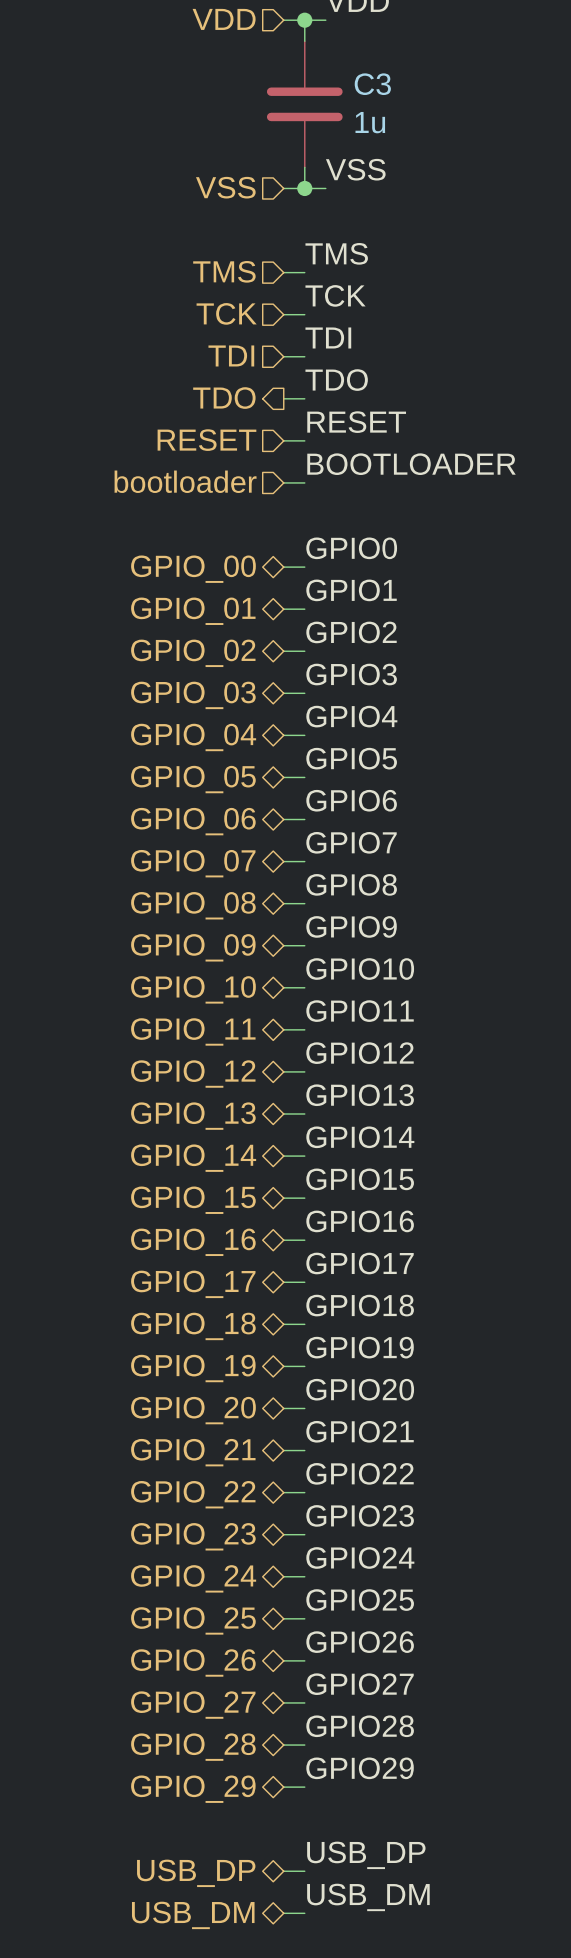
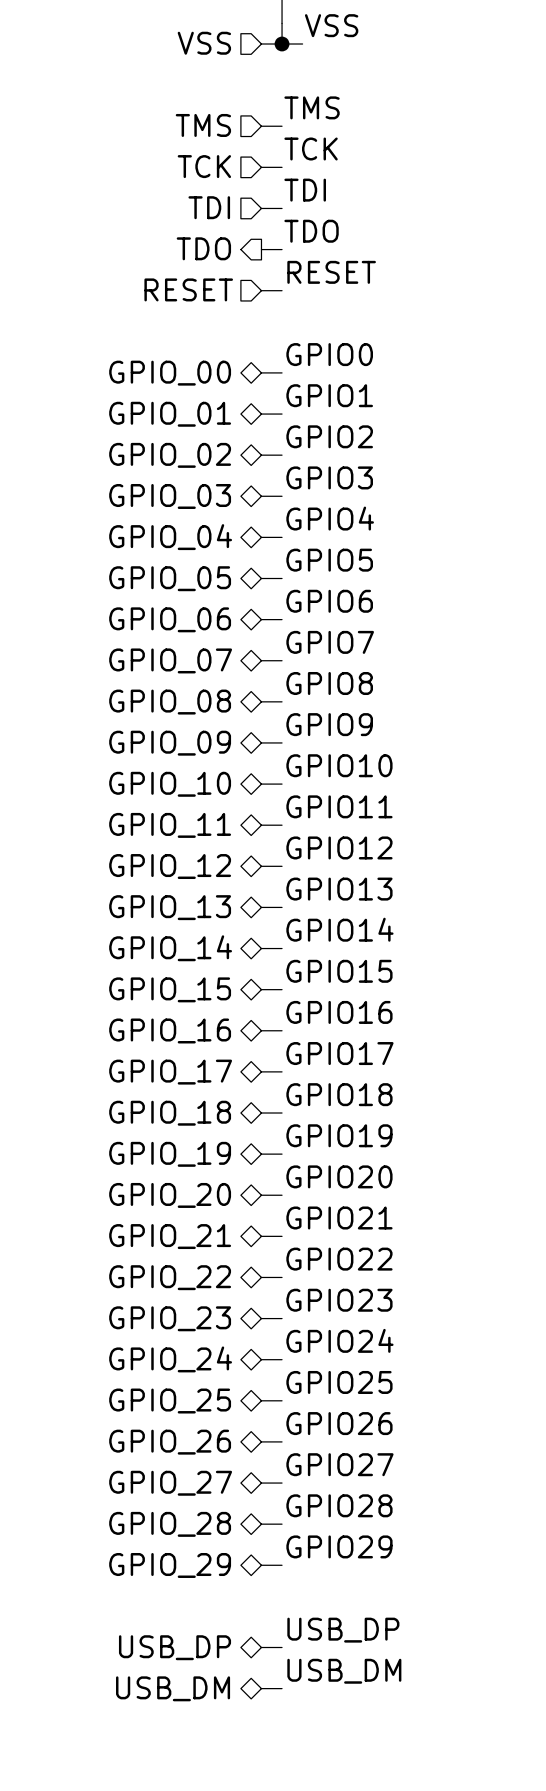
label: BOOTLOADER (411, 464) -> none
hierarchical label: bootloader (185, 481) -> none
wire: (283, 482) (304, 482) -> (261, 372) (282, 372)
label: none -> GPIO0 (329, 354)
hierarchical label: none -> GPIO_00 (170, 373)
label: GPIO0 (351, 548) -> GPIO1 (329, 395)
hierarchical label: GPIO_00 (193, 569) -> GPIO_01 (170, 414)
label: GPIO1 (351, 590) -> GPIO2 (329, 436)
hierarchical label: GPIO_01 (193, 611) -> GPIO_02 (170, 455)
label: GPIO2 (351, 632) -> GPIO3 (329, 477)
hierarchical label: GPIO_02 (193, 653) -> GPIO_03 (170, 496)
label: GPIO3 (351, 674) -> GPIO4 (330, 518)
hierarchical label: GPIO_03 (193, 695) -> GPIO_04 (170, 537)
label: GPIO4 (351, 716) -> GPIO5 (329, 560)
hierarchical label: GPIO_04 (193, 737) -> GPIO_05 (170, 578)
label: GPIO5 (351, 758) -> GPIO6 (329, 601)
hierarchical label: GPIO_05 (193, 779) -> GPIO_06 (170, 619)
label: GPIO6 (351, 800) -> GPIO7 (330, 642)
hierarchical label: GPIO_06 (193, 821) -> GPIO_07 (170, 660)
label: GPIO7 (351, 842) -> GPIO8 (329, 683)
hierarchical label: GPIO_07 (193, 863) -> GPIO_08 (170, 702)
label: GPIO8 (351, 884) -> GPIO9 (329, 724)
hierarchical label: GPIO_08 (193, 905) -> GPIO_09 (170, 743)
label: GPIO9 (351, 926) -> GPIO10 (339, 765)
hierarchical label: GPIO_09 (193, 947) -> GPIO_10 (170, 784)
label: GPIO10 (360, 969) -> GPIO11 (339, 806)
hierarchical label: GPIO_10 (193, 989) -> GPIO_11 (170, 825)
label: GPIO11 (360, 1011) -> GPIO12 (339, 847)
hierarchical label: GPIO_11 (193, 1031) -> GPIO_12 (170, 866)
label: GPIO12 (360, 1053) -> GPIO13 (339, 889)
hierarchical label: GPIO_12 (193, 1074) -> GPIO_13 (170, 907)
label: GPIO13 (360, 1095) -> GPIO14 (339, 929)
hierarchical label: GPIO_13 (193, 1116) -> GPIO_14 (170, 948)
label: GPIO14 (360, 1137) -> GPIO15 (339, 971)
hierarchical label: GPIO_14 (193, 1158) -> GPIO_15 (170, 989)
label: GPIO15 (360, 1179) -> GPIO16 (339, 1012)
hierarchical label: GPIO_15 (193, 1200) -> GPIO_16 (170, 1030)
label: GPIO16 (360, 1221) -> GPIO17 (339, 1053)
hierarchical label: GPIO_16 (193, 1242) -> GPIO_17 (170, 1072)
label: GPIO17 (360, 1263) -> GPIO18 (339, 1094)
hierarchical label: GPIO_17 (193, 1284) -> GPIO_18 (170, 1113)
label: GPIO18 (360, 1305) -> GPIO19 (339, 1135)
hierarchical label: GPIO_18 (193, 1326) -> GPIO_19 (170, 1154)
label: GPIO19 (360, 1347) -> GPIO20 (339, 1176)
hierarchical label: GPIO_19 (193, 1368) -> GPIO_20 (170, 1195)
label: GPIO20 (360, 1389) -> GPIO21 (339, 1218)
hierarchical label: GPIO_20 (193, 1410) -> GPIO_21 (170, 1236)
label: GPIO21 (360, 1431) -> GPIO22 (339, 1259)
hierarchical label: GPIO_21 (193, 1452) -> GPIO_22 (170, 1277)
label: GPIO22 (360, 1473) -> GPIO23 (339, 1300)
hierarchical label: GPIO_22 (193, 1494) -> GPIO_23 (170, 1318)
label: GPIO23 (360, 1515) -> GPIO24 (339, 1340)
hierarchical label: GPIO_23 (193, 1536) -> GPIO_24 (170, 1359)
label: GPIO24 (360, 1557) -> GPIO25 (339, 1382)
hierarchical label: GPIO_24 (193, 1578) -> GPIO_25 (170, 1401)
label: GPIO25 (360, 1600) -> GPIO26 (339, 1423)
hierarchical label: GPIO_25 (193, 1620) -> GPIO_26 (170, 1442)
label: GPIO26 (360, 1642) -> GPIO27 (339, 1464)
hierarchical label: GPIO_26 (193, 1662) -> GPIO_27 (170, 1483)
label: GPIO27 (360, 1684) -> GPIO28 (339, 1505)
hierarchical label: GPIO_27 (193, 1705) -> GPIO_28 (170, 1524)
label: GPIO28 (360, 1726) -> GPIO29 (339, 1546)
hierarchical label: GPIO_28 (193, 1747) -> GPIO_29 (170, 1565)
label: GPIO29 (360, 1768) -> none
wire: (283, 1787) (304, 1787) -> (261, 1647) (282, 1647)
hierarchical label: GPIO_29 (193, 1789) -> none
label: none -> USB_DP (343, 1630)
hierarchical label: none -> USB_DP (175, 1647)
label: USB_DP (366, 1855) -> USB_DM (344, 1671)
hierarchical label: USB_DP (196, 1873) -> USB_DM (173, 1688)
label: USB_DM (368, 1897) -> none
wire: (283, 1913) (304, 1913) -> none
hierarchical label: USB_DM (193, 1915) -> none

